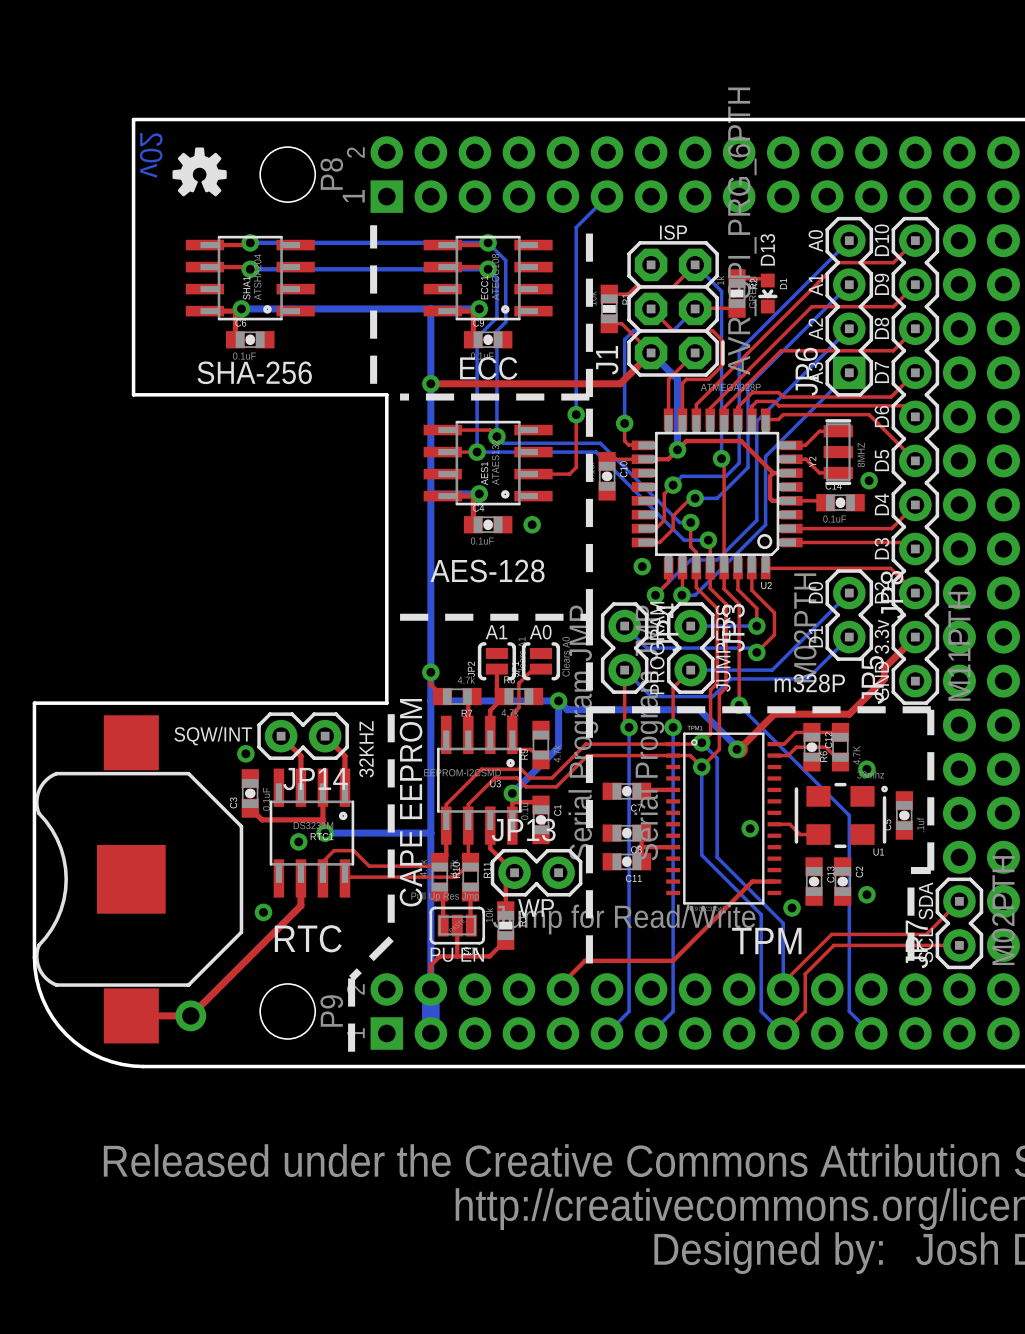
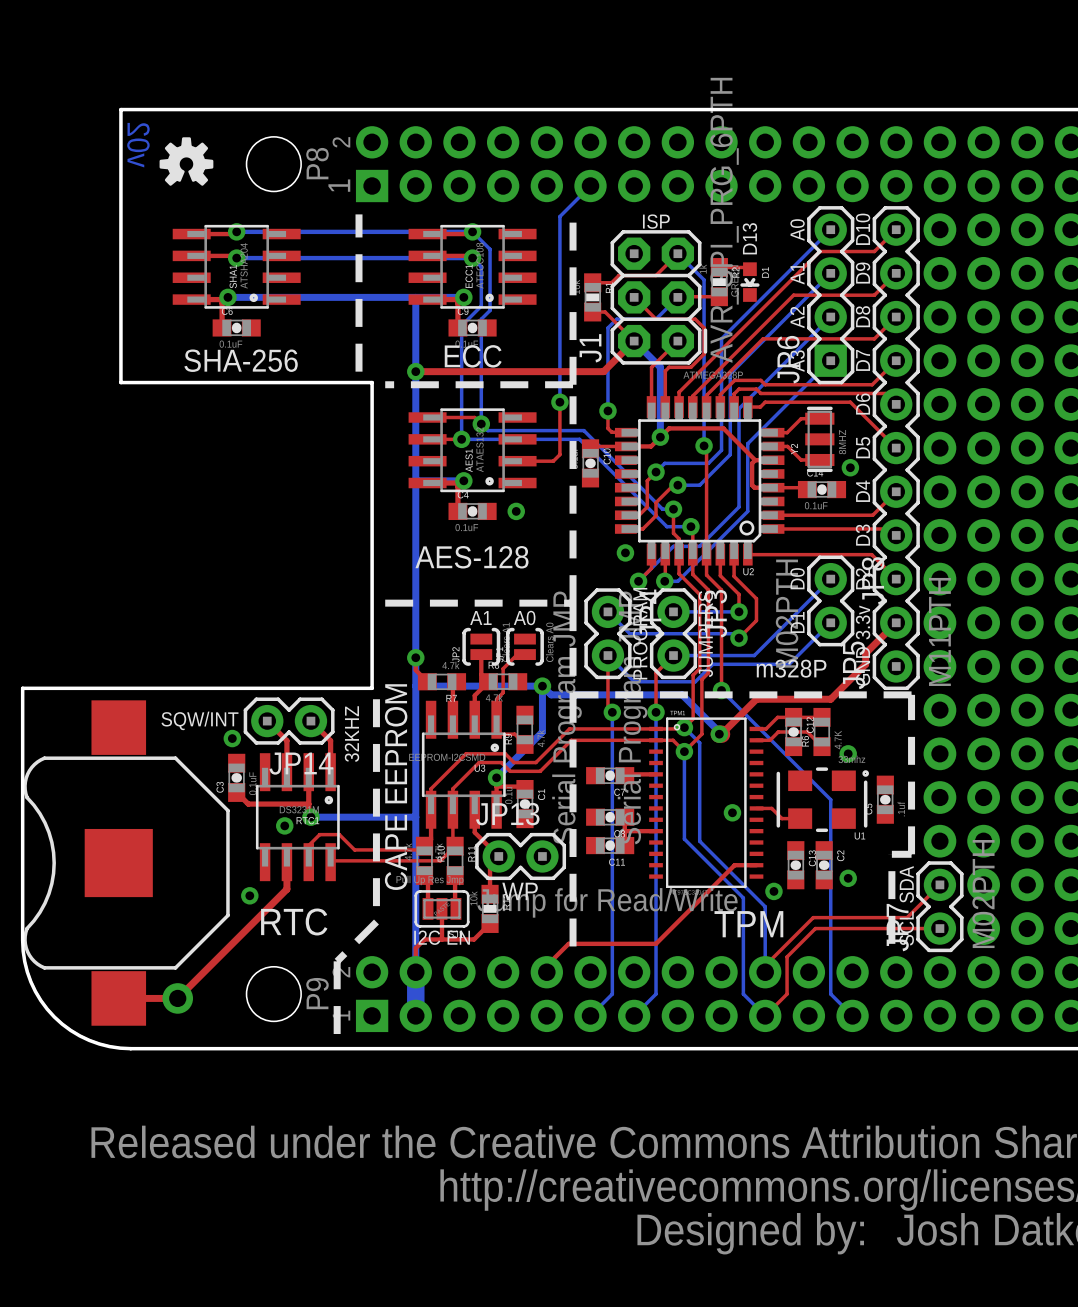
text: PU EN (457, 954) -> I2C EN (442, 937)

